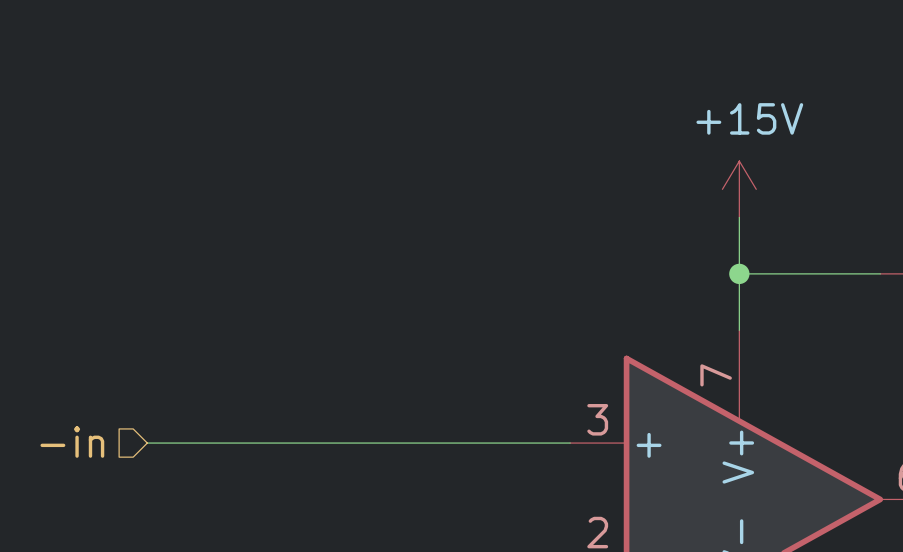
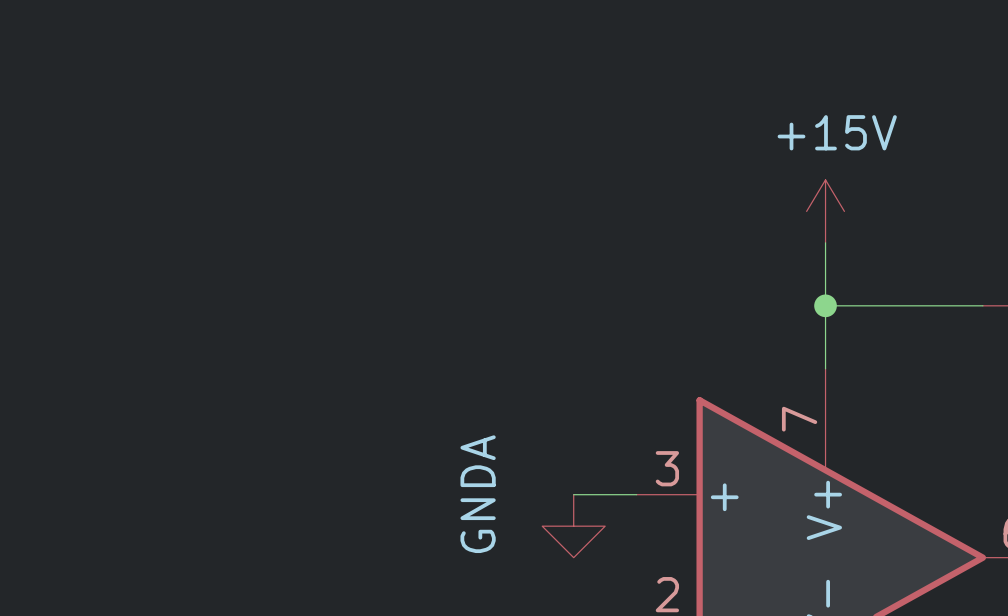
hierarchical label: -in (72, 441) -> none
wire: (147, 443) (513, 443) -> none
power symbol: none -> GNDA (573, 526)

